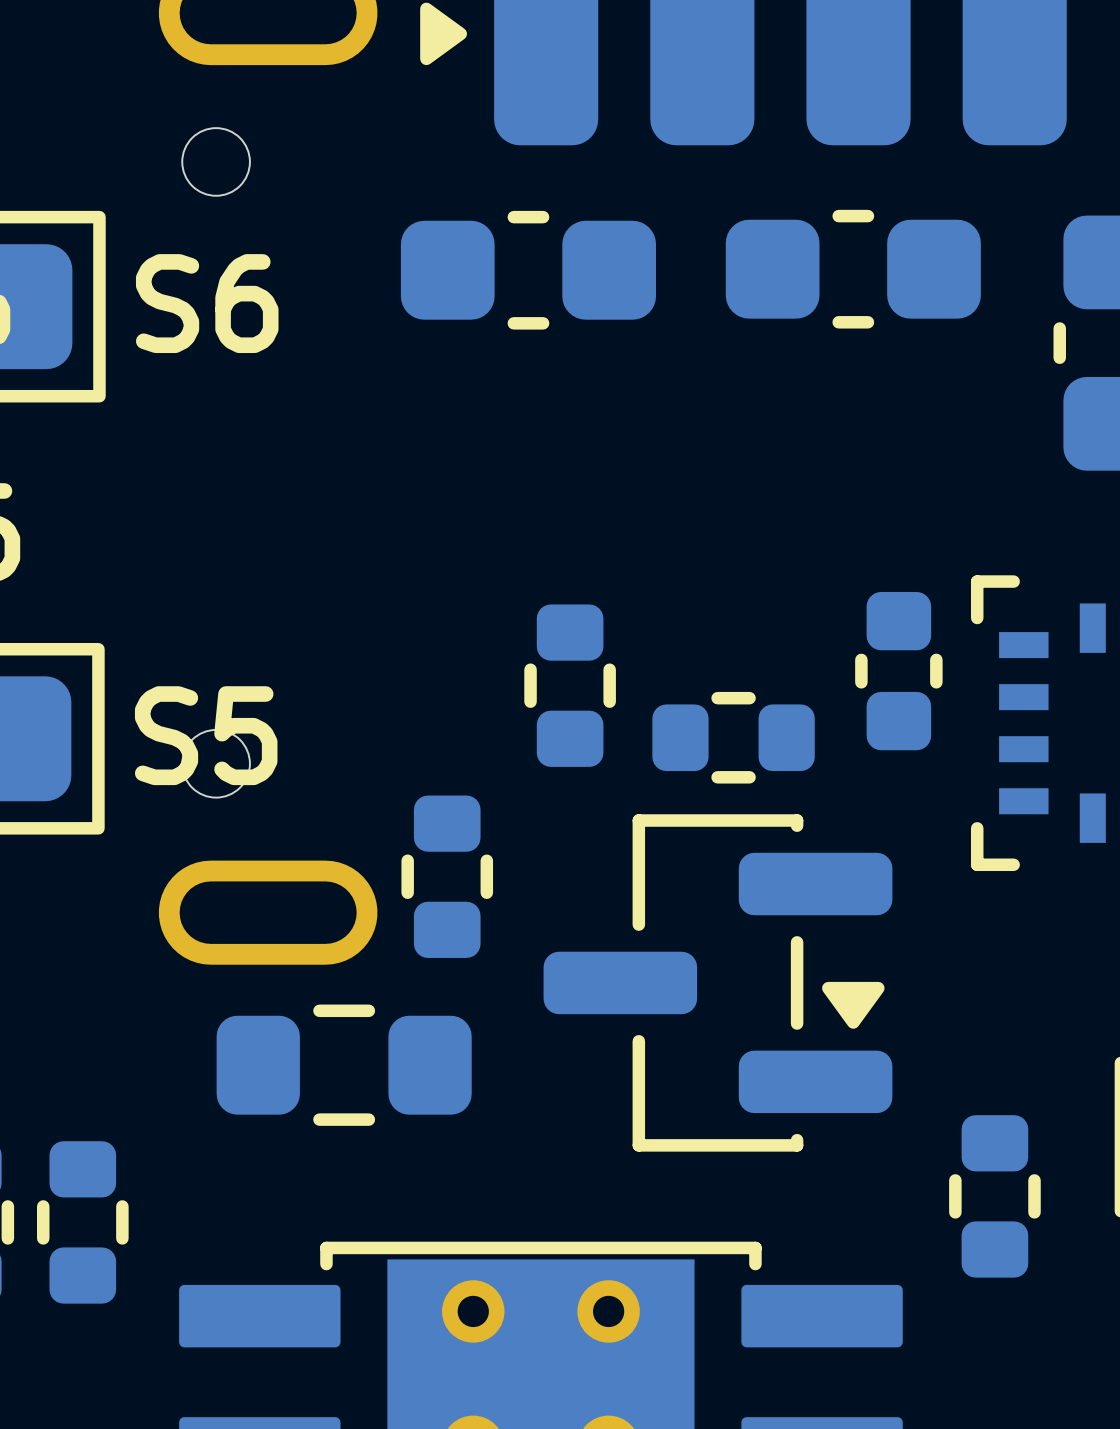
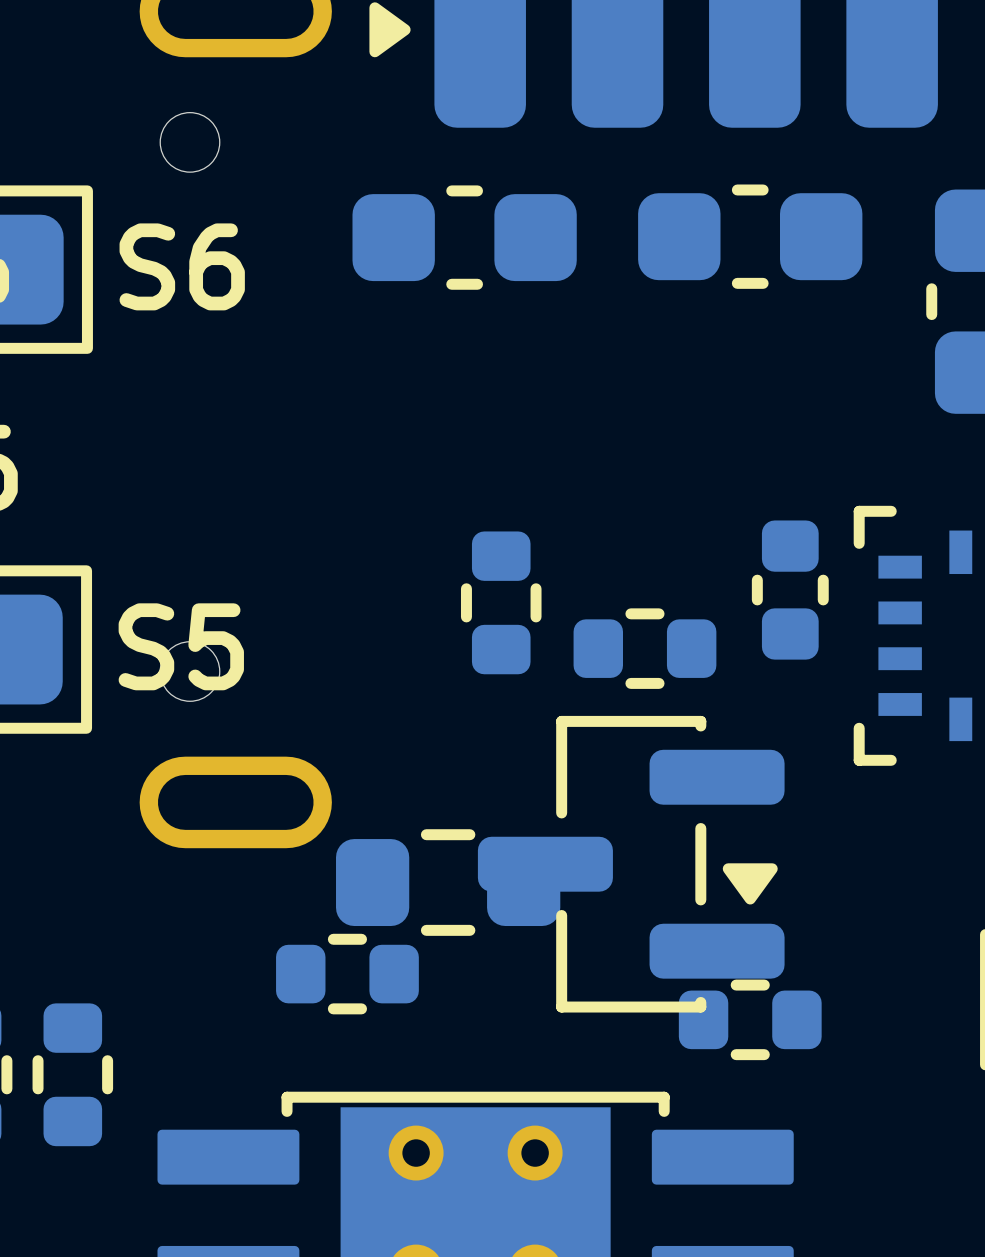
part: (447, 876) -> none
part: none -> (448, 882)
part footprint: [216, 1004, 472, 1126] -> [276, 933, 419, 1015]
part rotation: 0° (994, 1196) -> 90° clockwise (750, 1019)
part position: (994, 1196) -> (750, 1019)

